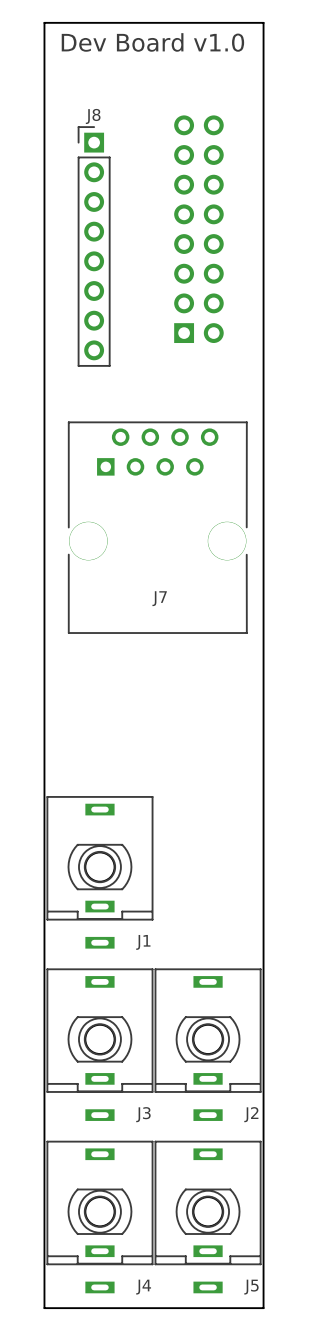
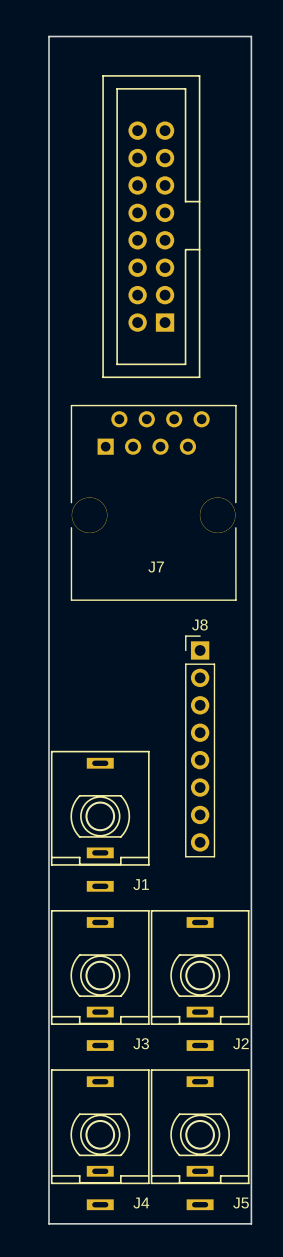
text: Dev Board v1.0 (152, 42) -> none
part side: bottom (198, 229) -> top (151, 226)
J8 position: (94, 246) -> (200, 746)

